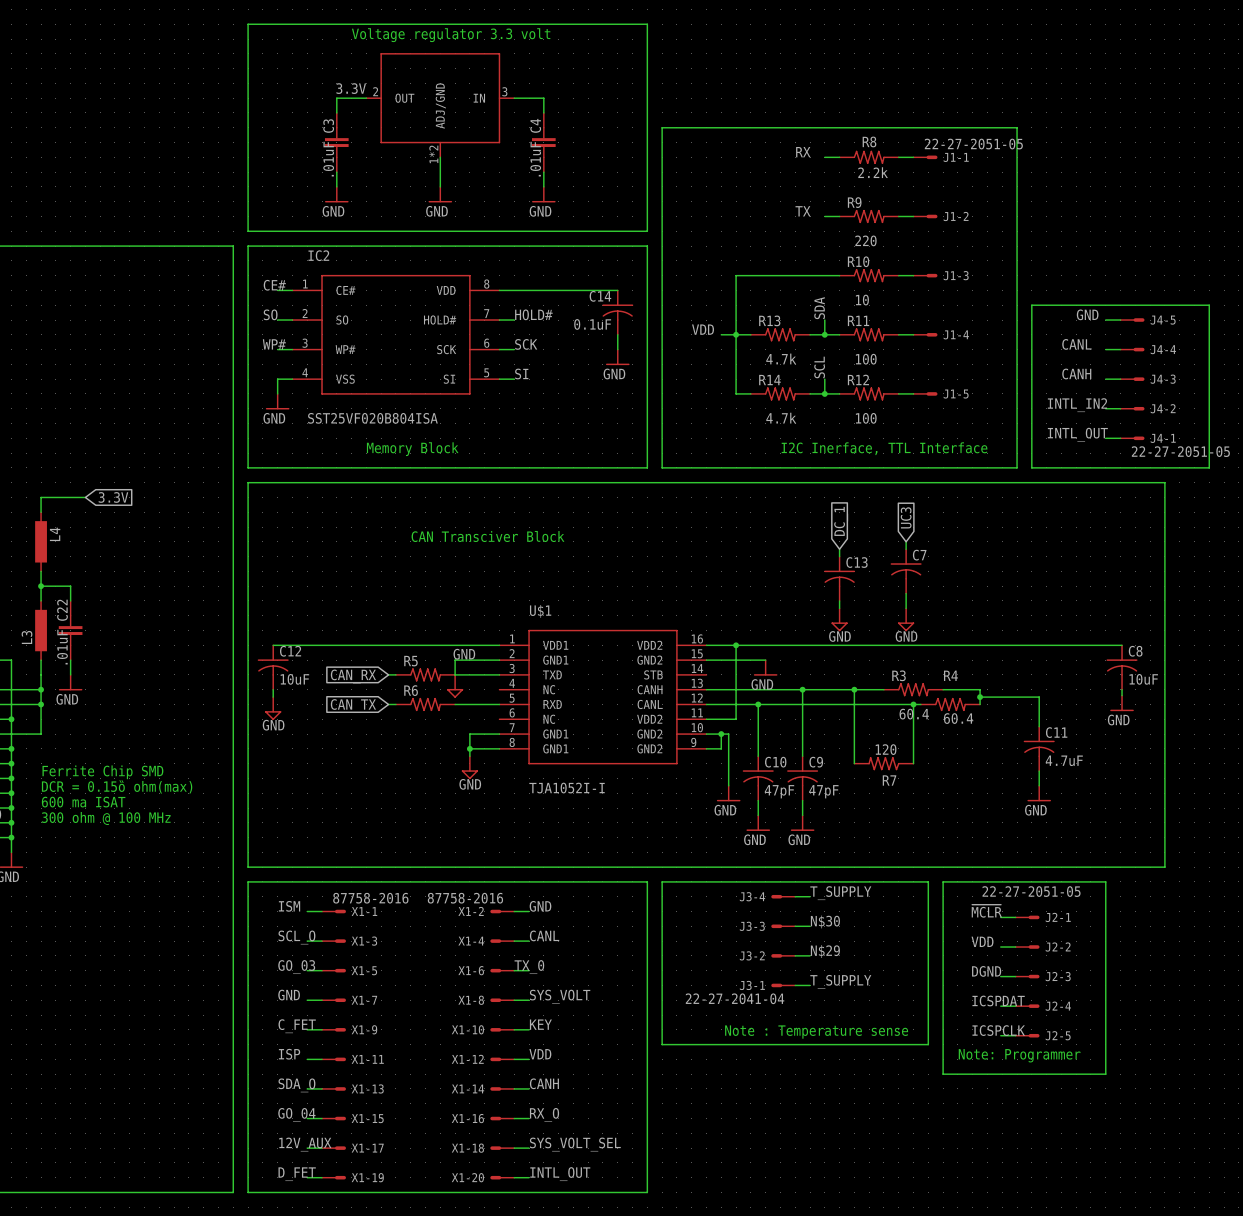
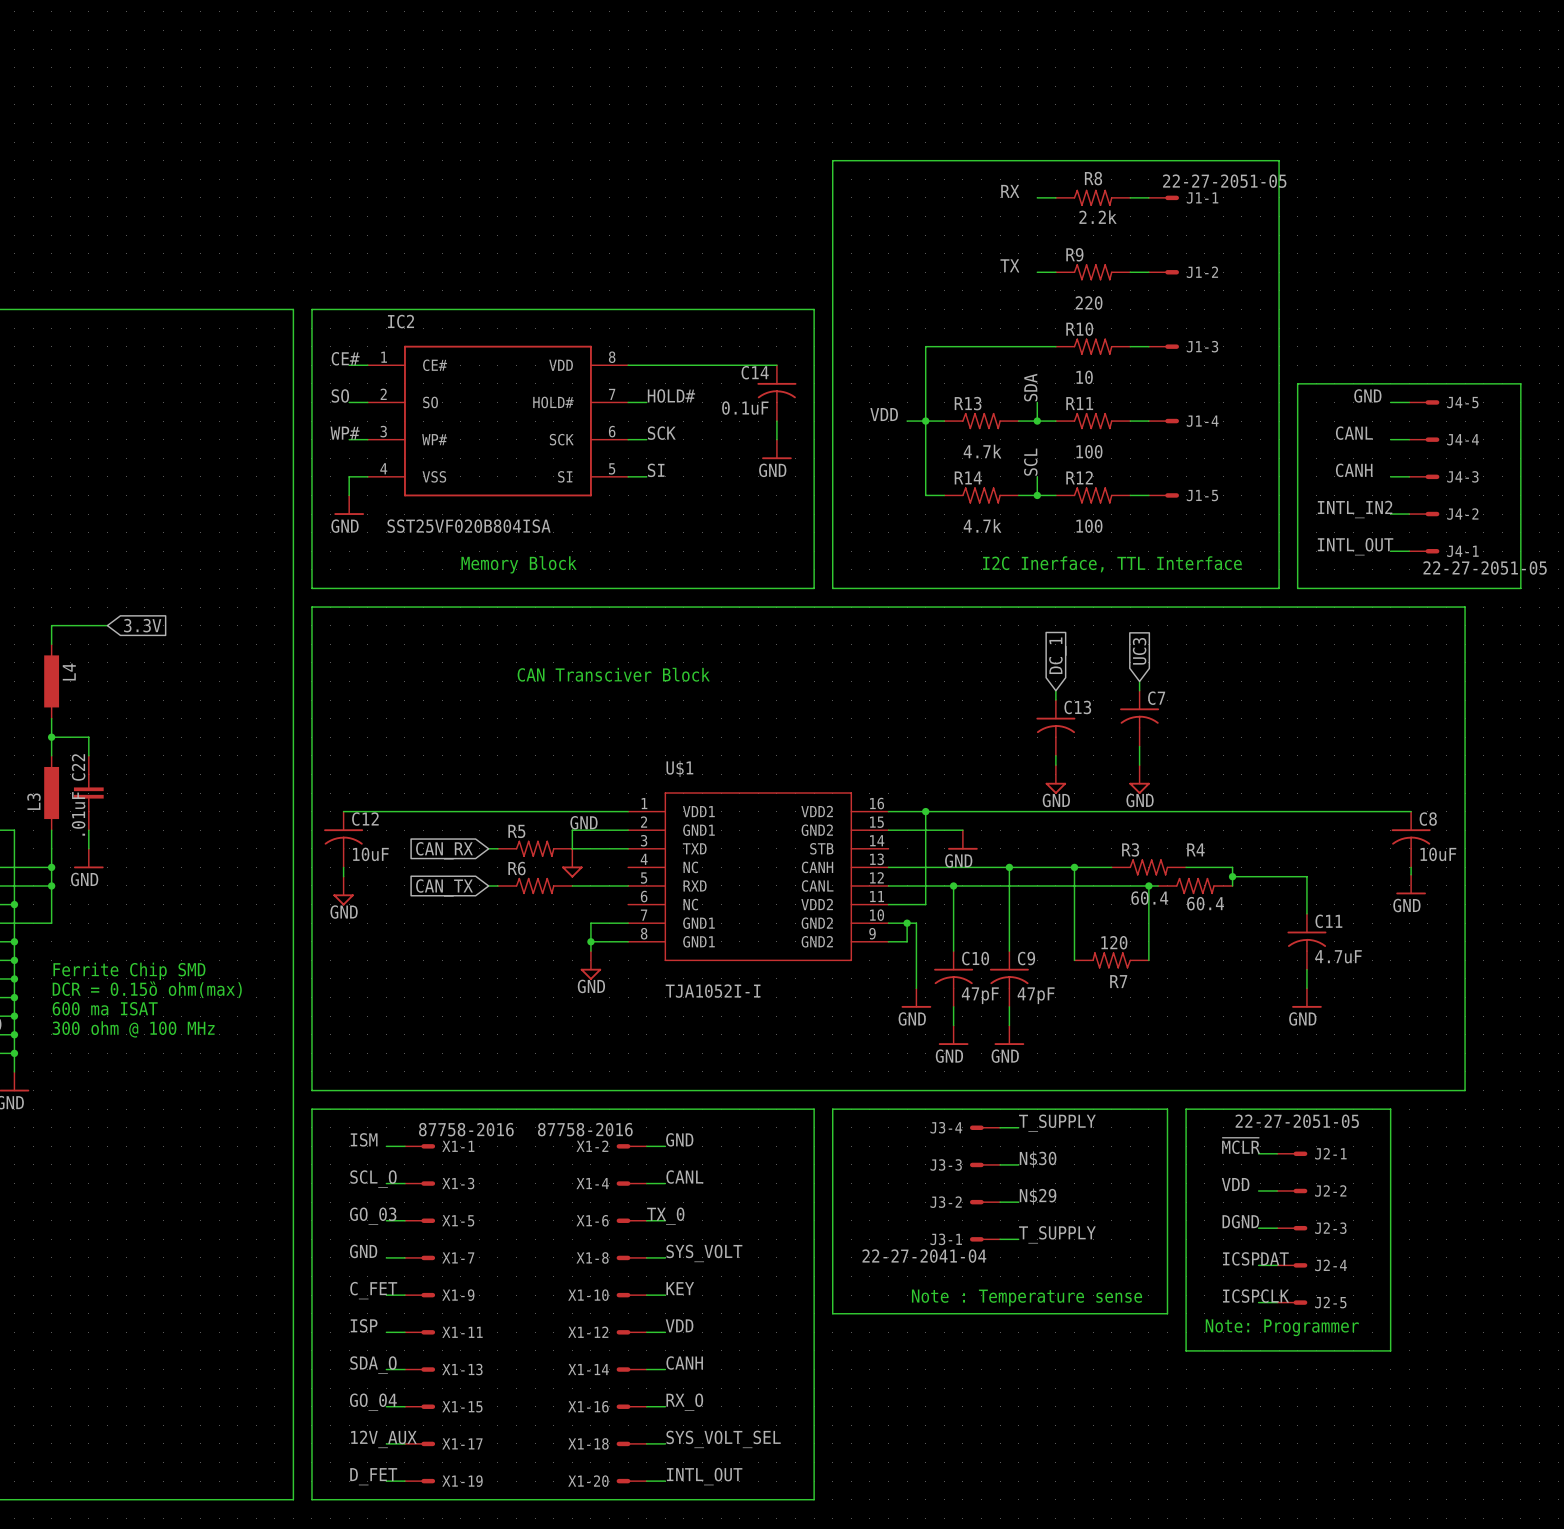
wire: (248, 24) (248, 231) (647, 231) (647, 24) (248, 24) -> none
text: Voltage regulator 3.3 volt (451, 35) -> none
label: 3.3V (351, 88) -> none
wire: (366, 98) (336, 98) (336, 112) -> none
wire: (514, 98) (543, 98) (543, 112) -> none
part: (440, 105) -> none
C3: .01uF (336, 142) -> none
C4: .01uF (543, 142) -> none
wire: (440, 157) (440, 186) -> none
wire: (336, 172) (336, 186) -> none
wire: (543, 172) (543, 186) -> none
power symbol: GND (336, 194) -> none
power symbol: GND (440, 194) -> none
power symbol: GND (543, 194) -> none

